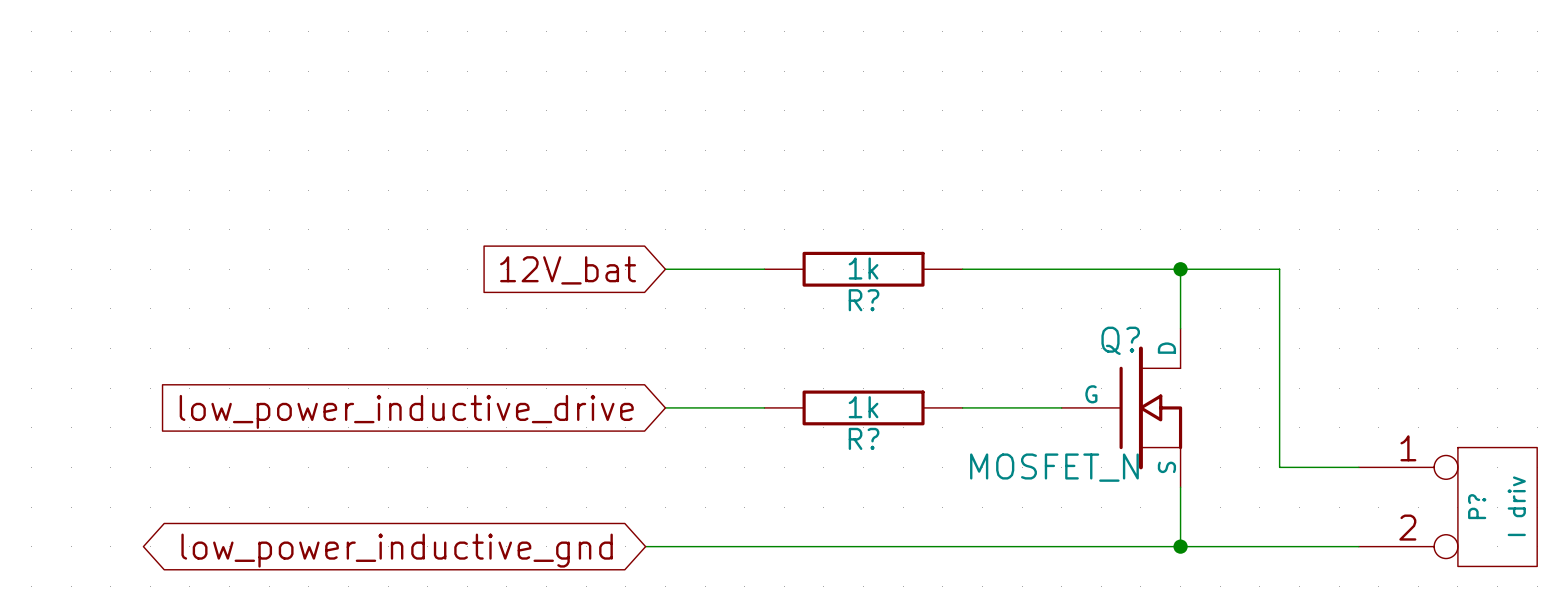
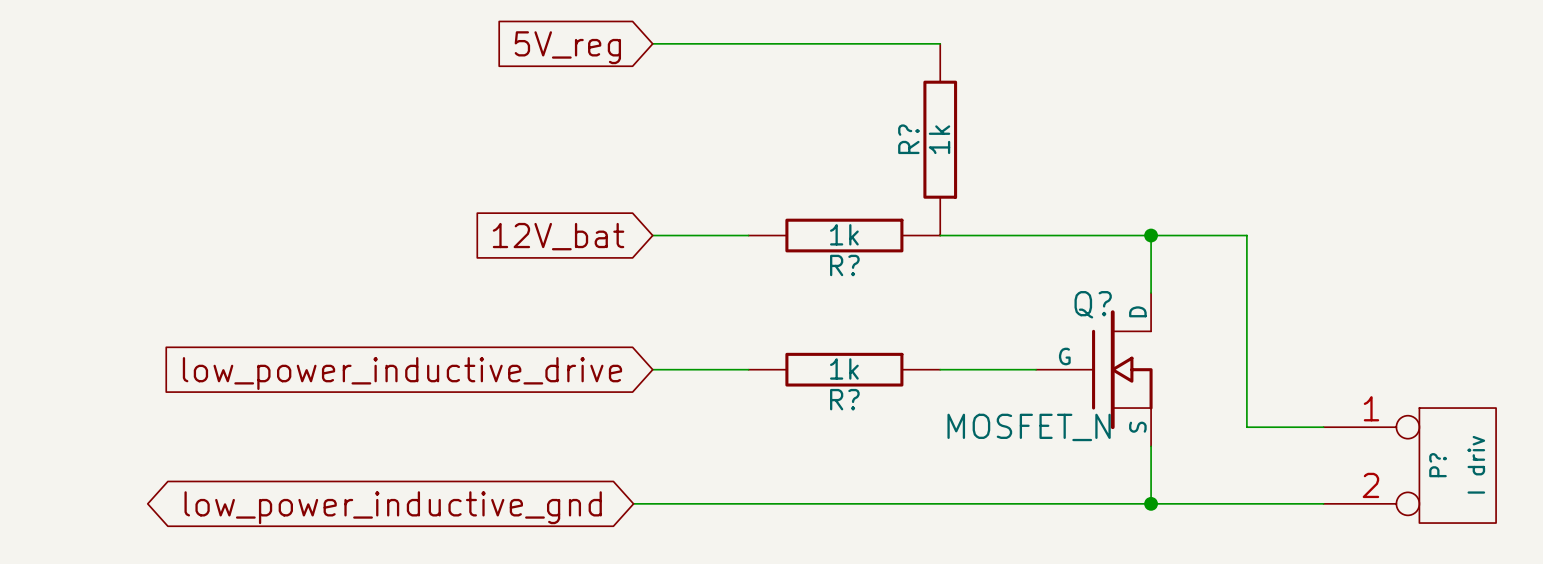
wire: none -> (652, 43) (940, 43)
global label: none -> 5V_reg (567, 47)
R?: none -> 1k (940, 139)

